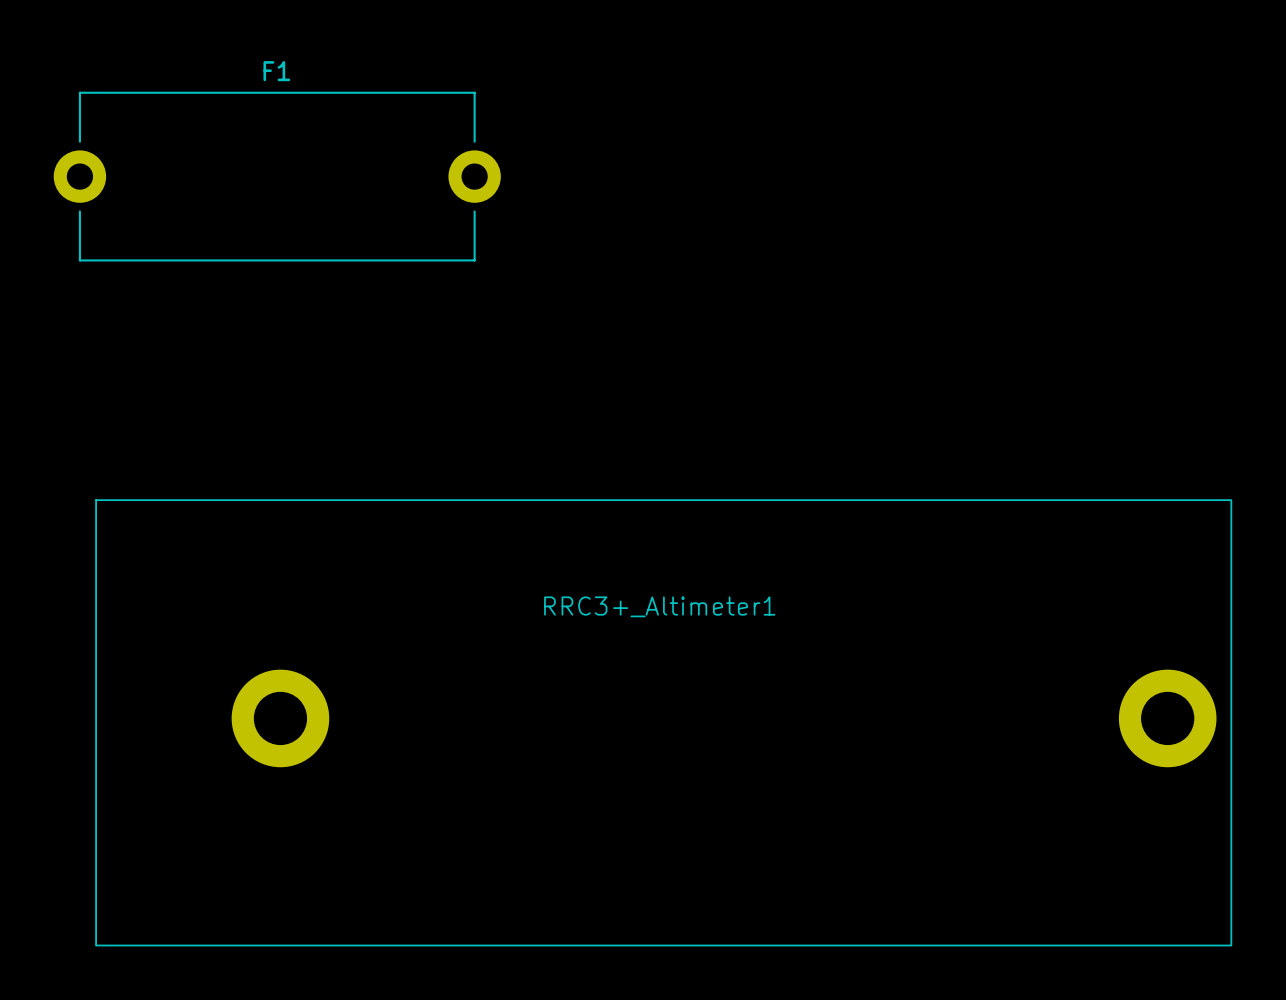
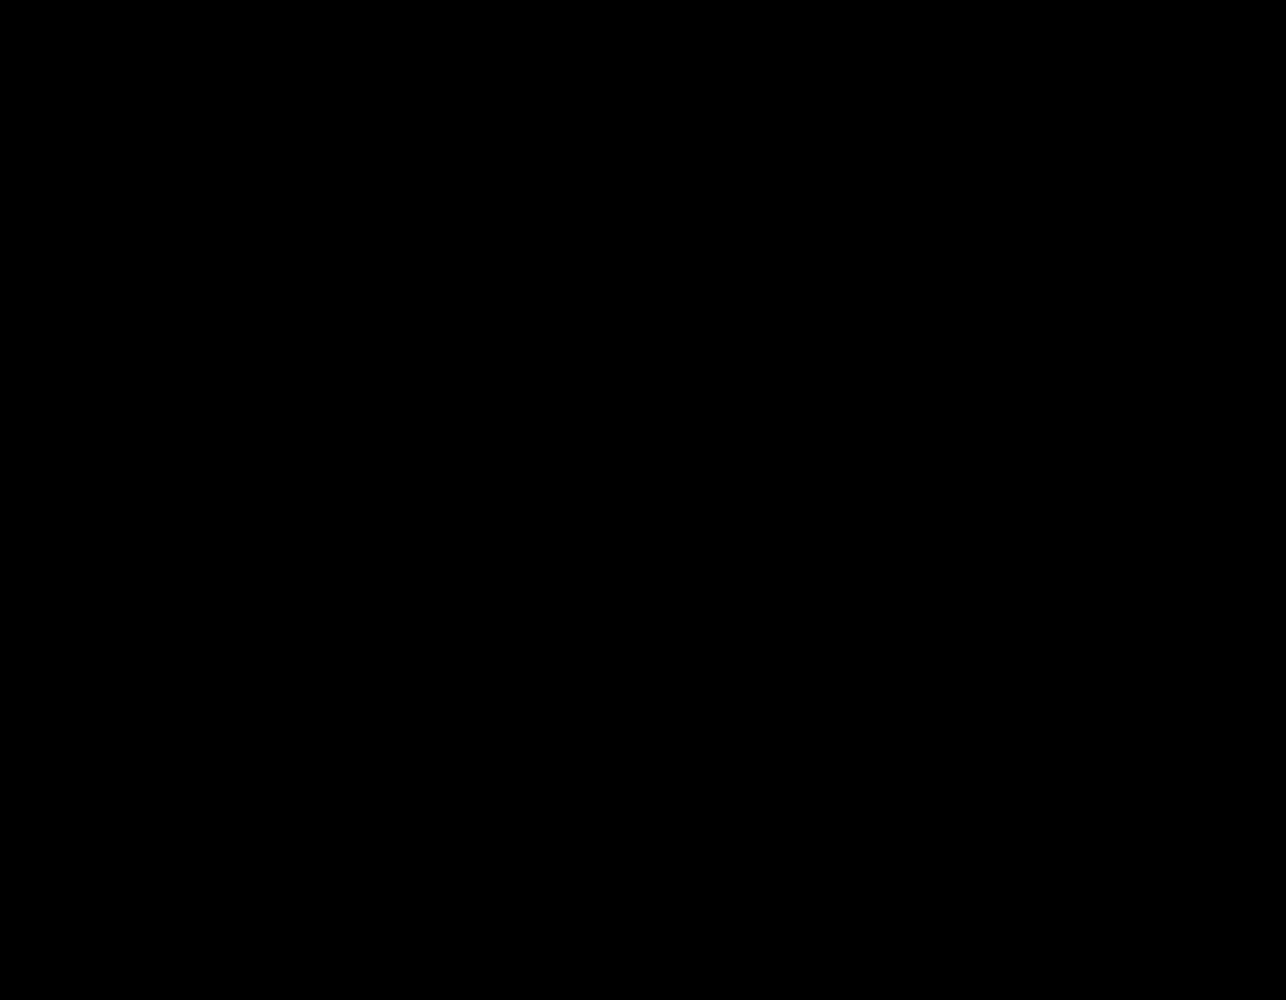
F1: (277, 176) -> none
RRC3+_Altimeter1: (663, 722) -> none

